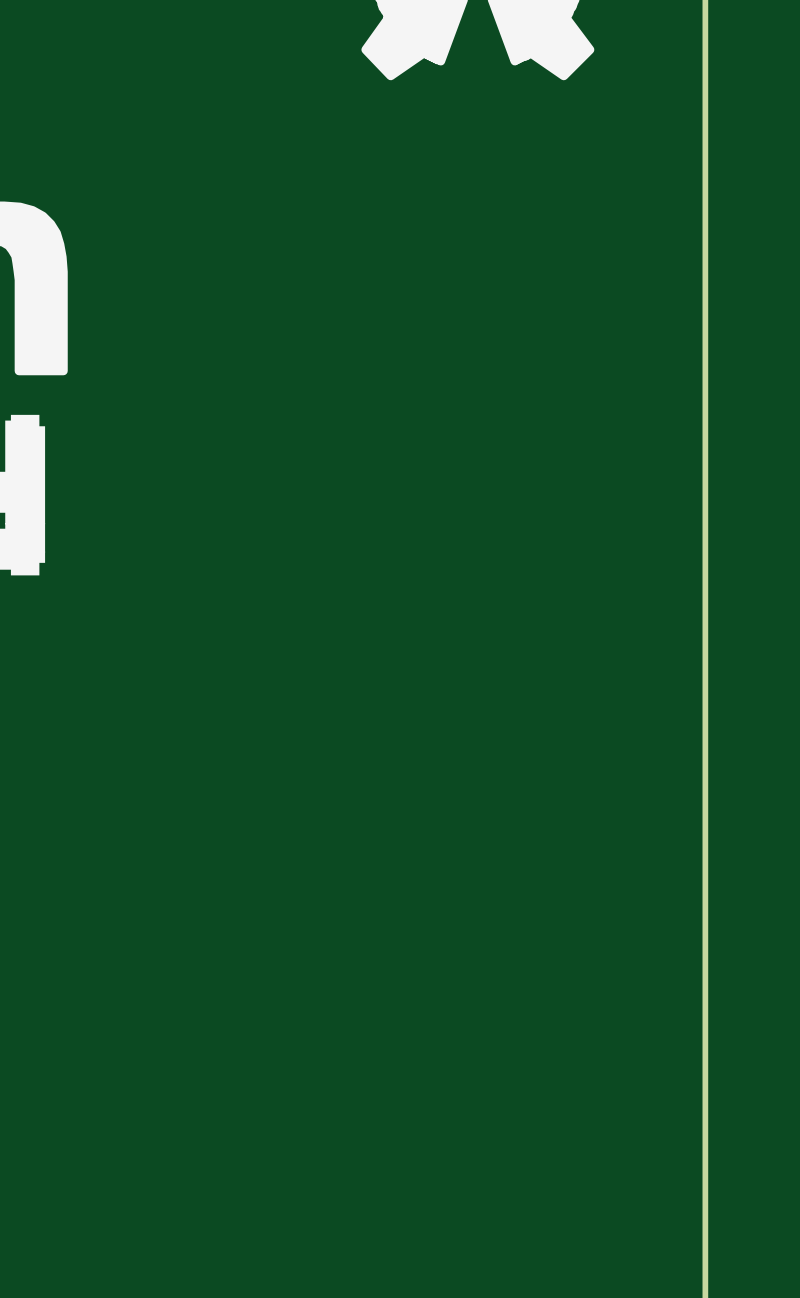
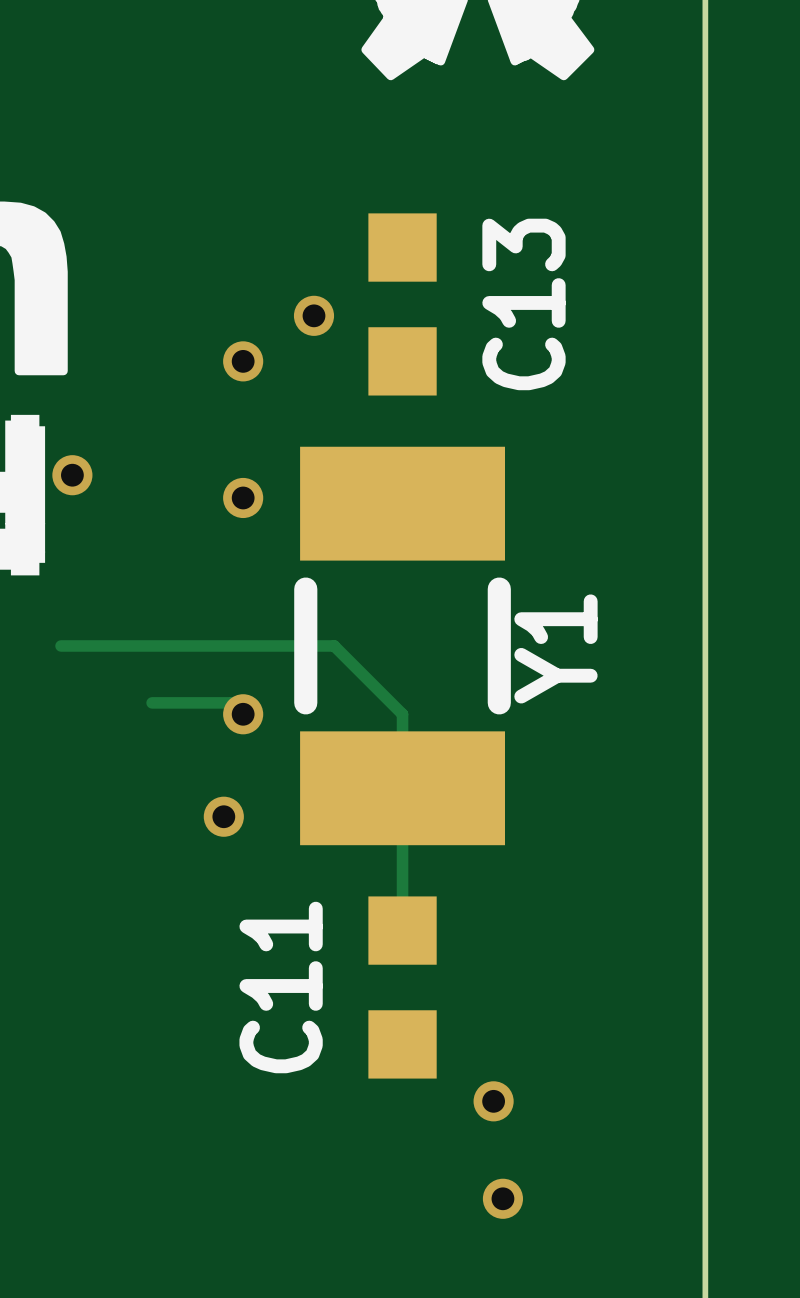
C13: none -> (402, 304)
via: none -> (313, 315)
via: none -> (243, 361)
via: none -> (72, 475)
via: none -> (243, 497)
track: none -> (61, 645) (334, 645) (402, 714) (402, 930)
Y1: none -> (402, 645)
track: none -> (152, 702) (231, 702) (243, 714)
via: none -> (243, 714)
via: none -> (223, 816)
C11: none -> (402, 987)
via: none -> (493, 1101)
via: none -> (502, 1198)

